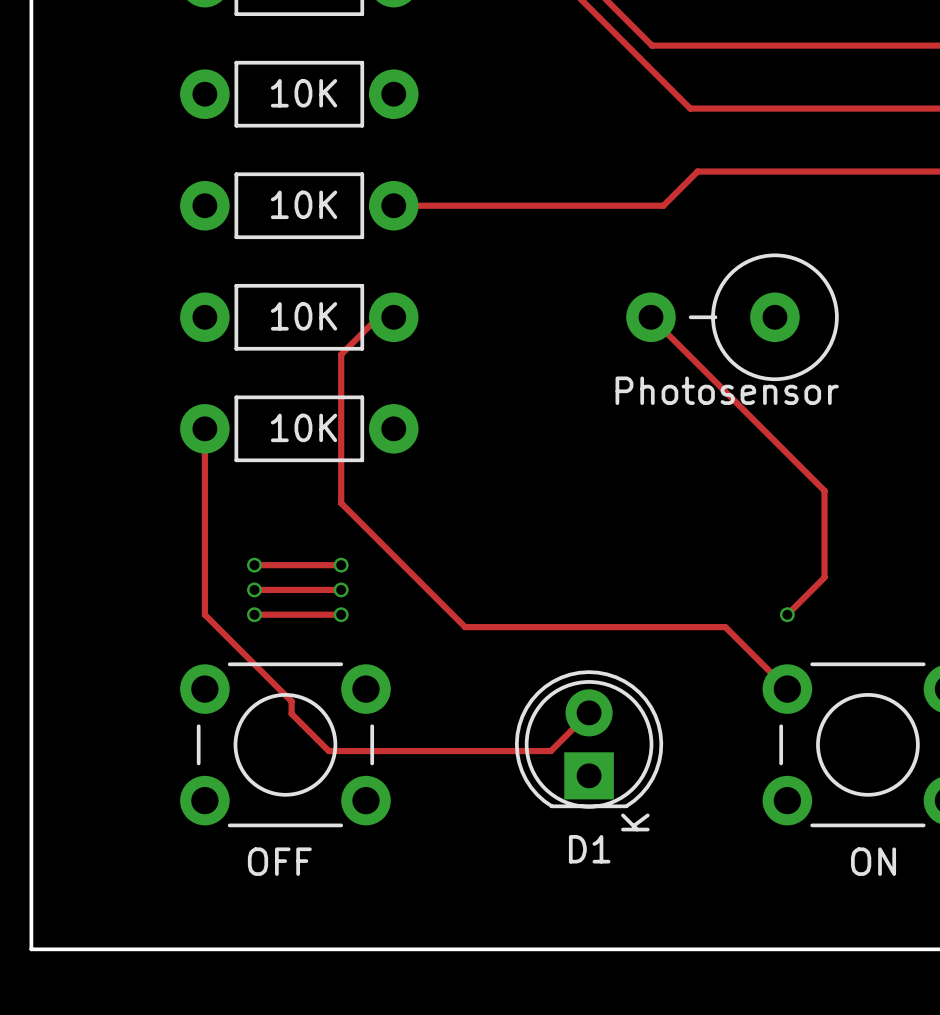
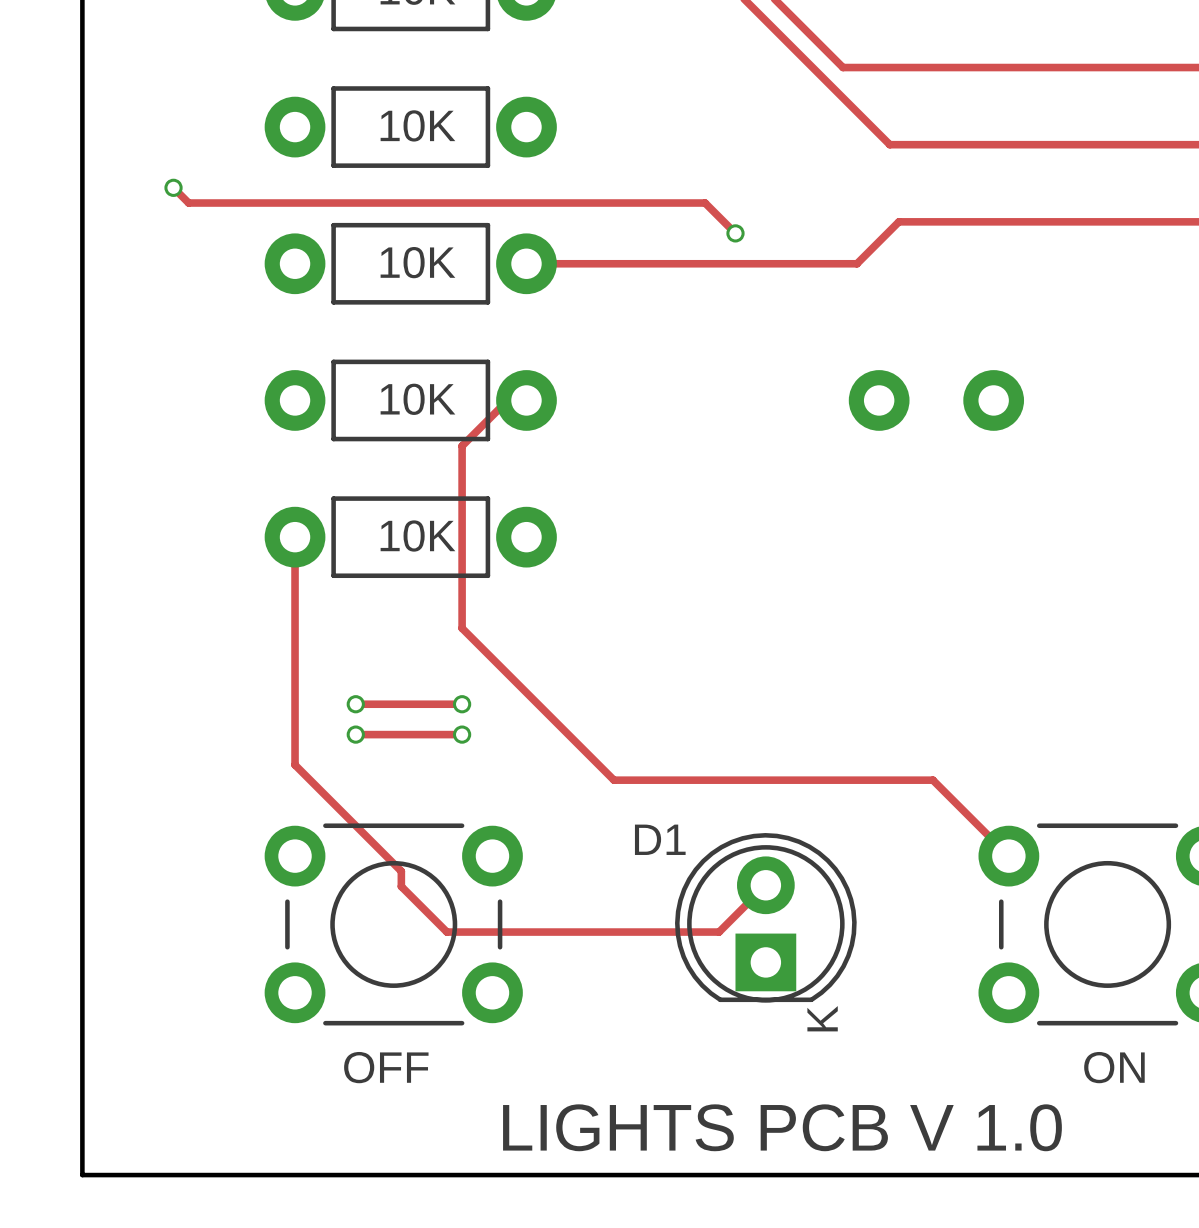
track: none -> (173, 187) (188, 203) (705, 203) (735, 233)
via: none -> (173, 187)
via: none -> (735, 233)
track: (650, 317) (824, 490) (824, 577) (787, 614) -> none
part: none -> (936, 400)
Photosensor: (732, 317) -> none
track: (254, 614) (341, 614) -> none
via: (254, 614) -> none
via: (341, 614) -> none
via: (787, 614) -> none
D1 name position: D1 (589, 849) -> D1 (660, 839)
text: none -> LIGHTS PCB V 1.0 (782, 1127)

